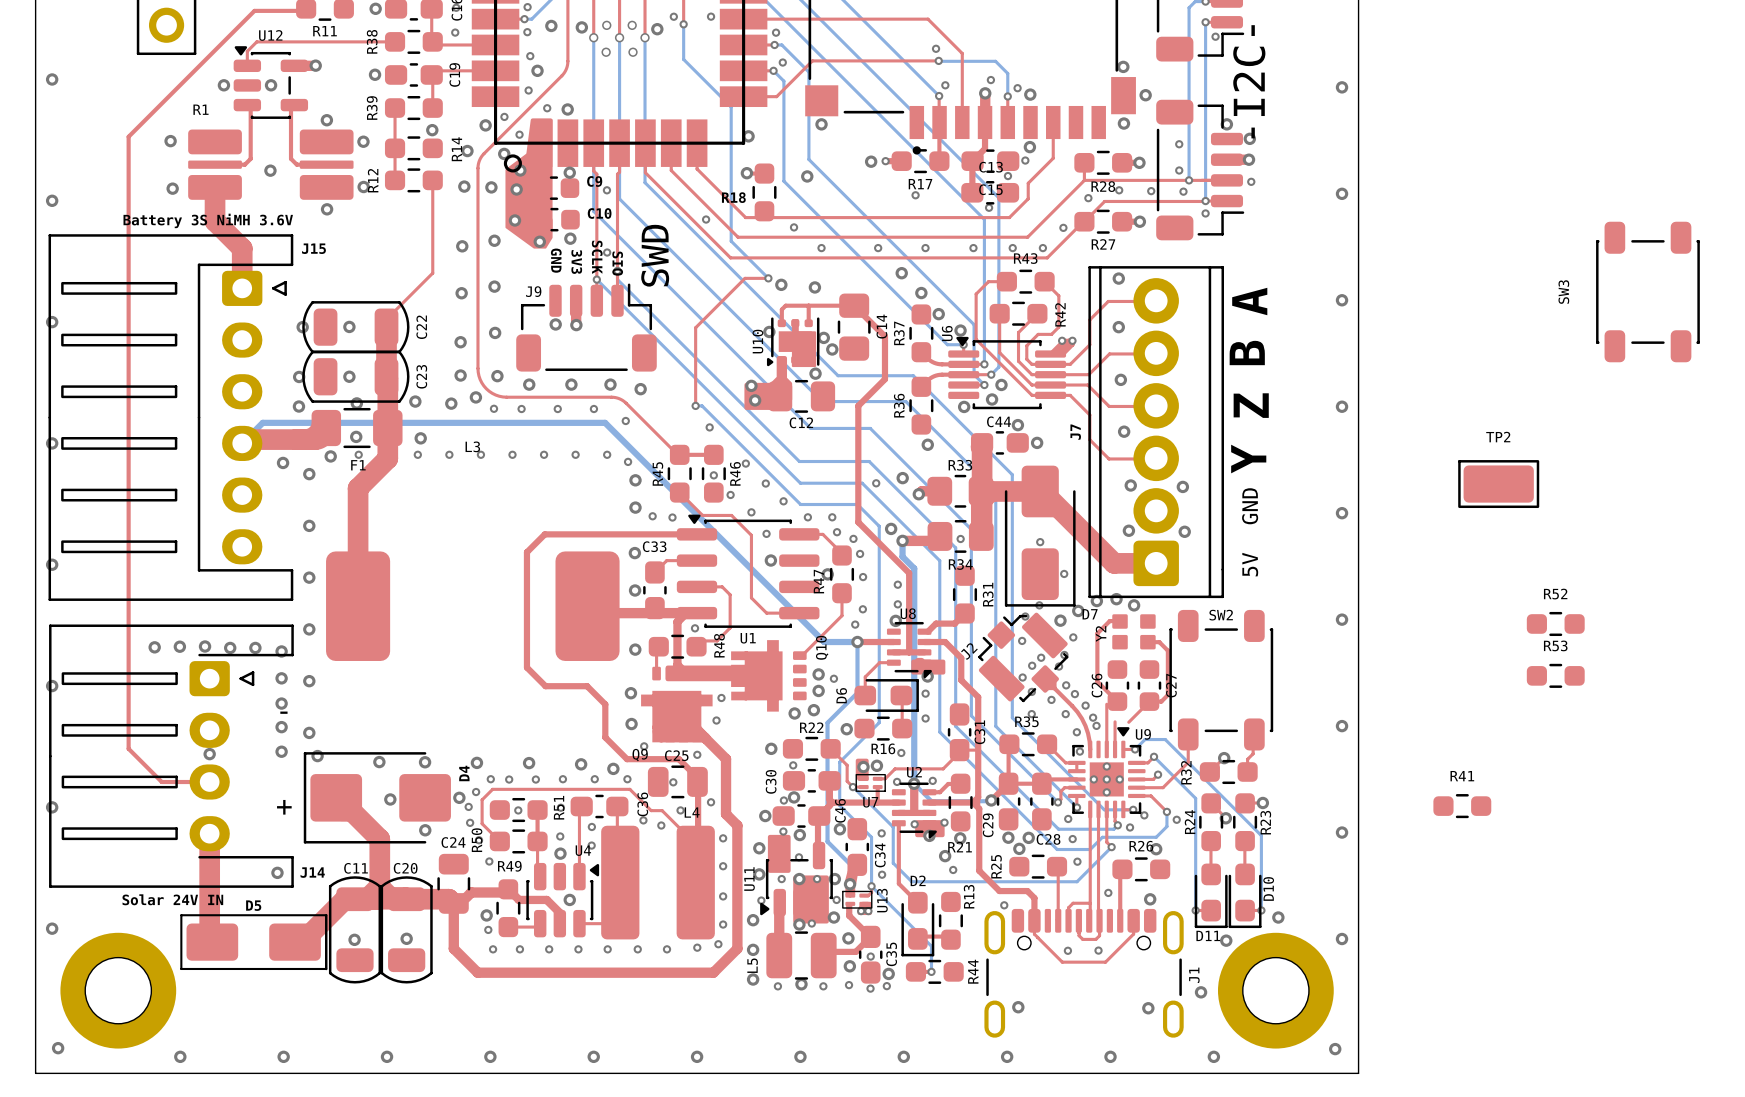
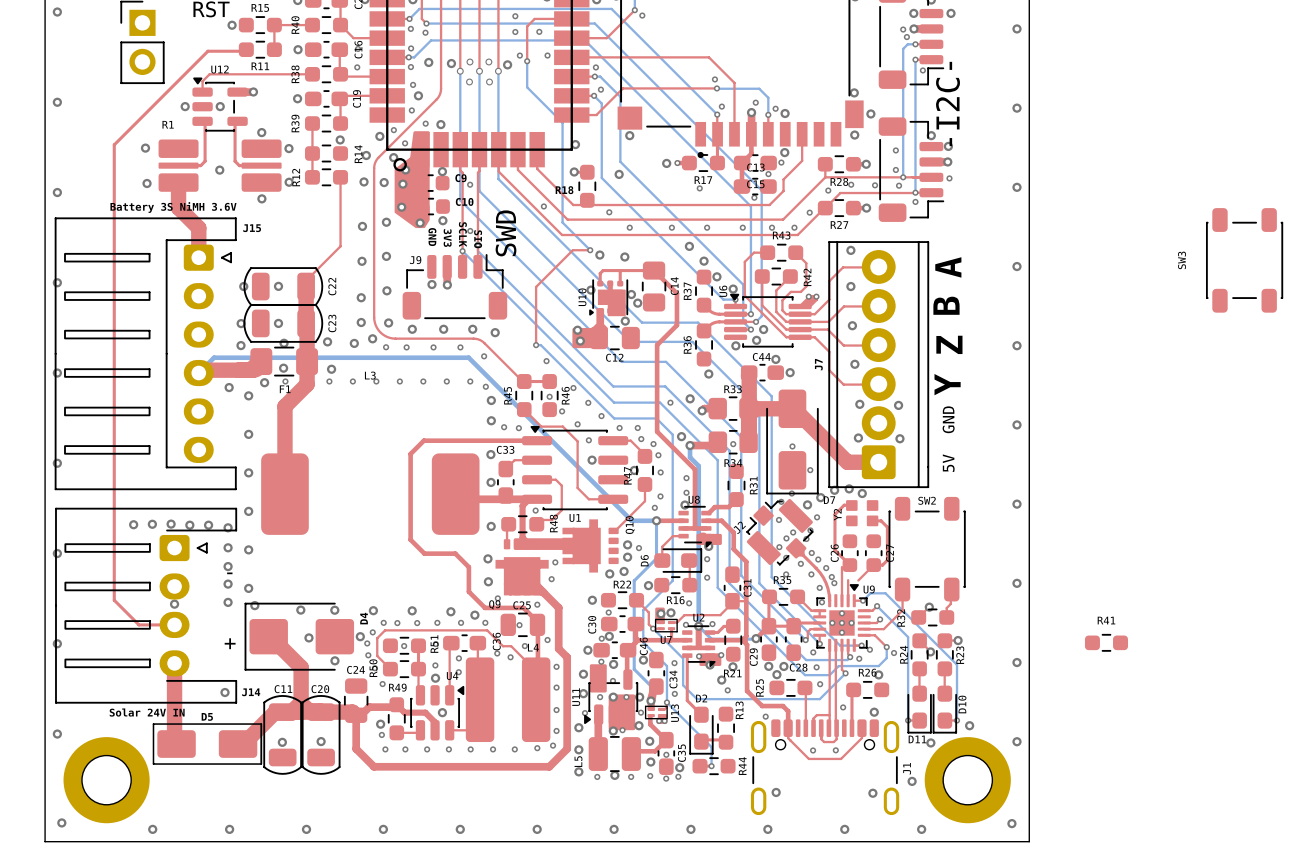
TP2: (1498, 484) -> none
R52: (1555, 623) -> none
R53: (1555, 675) -> none

